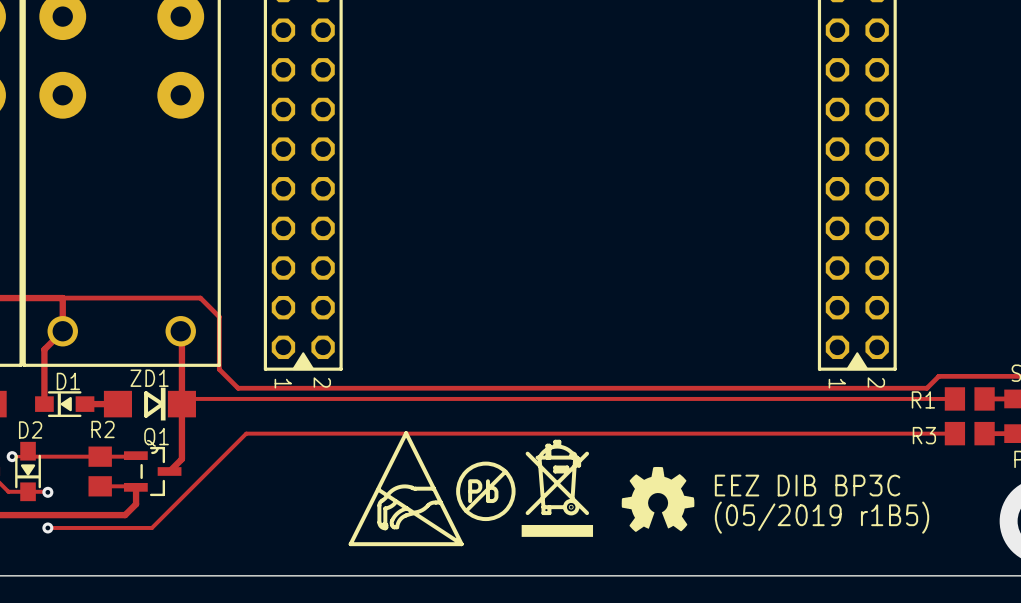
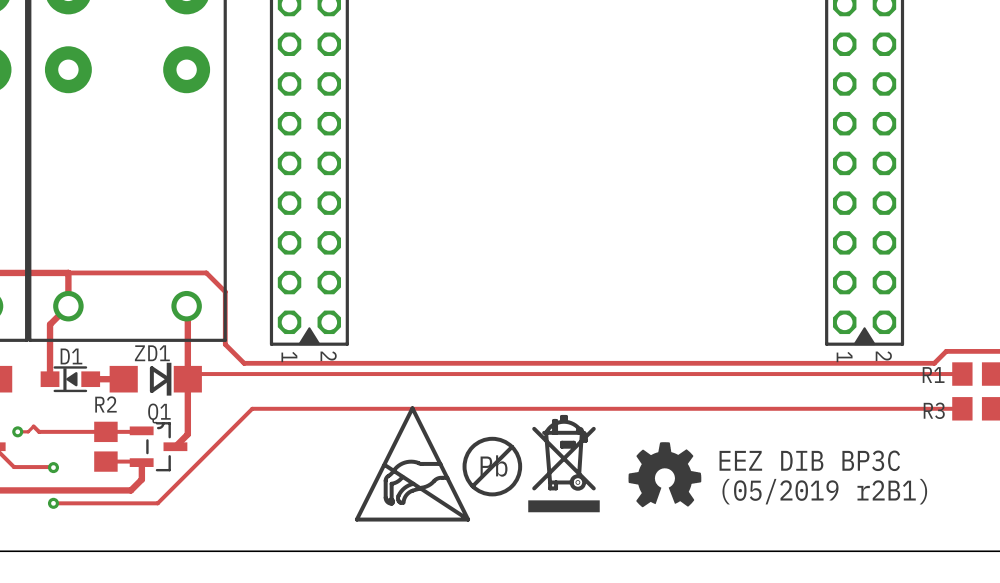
D2: (28, 471) -> none
text: (05/2019 r1B5) (822, 517) -> (05/2019 r2B1) (824, 491)

